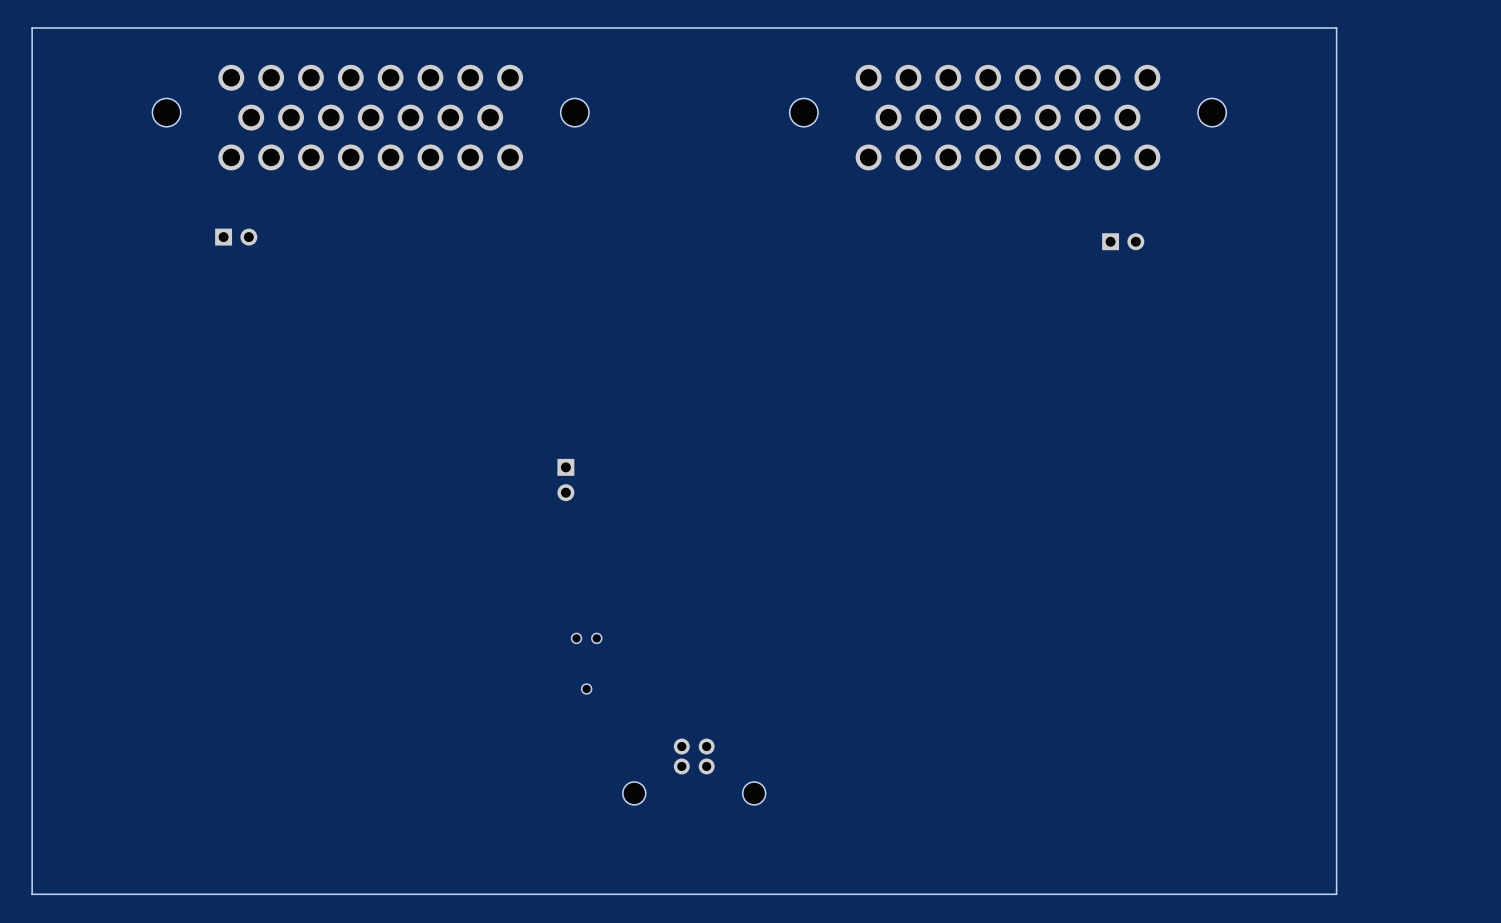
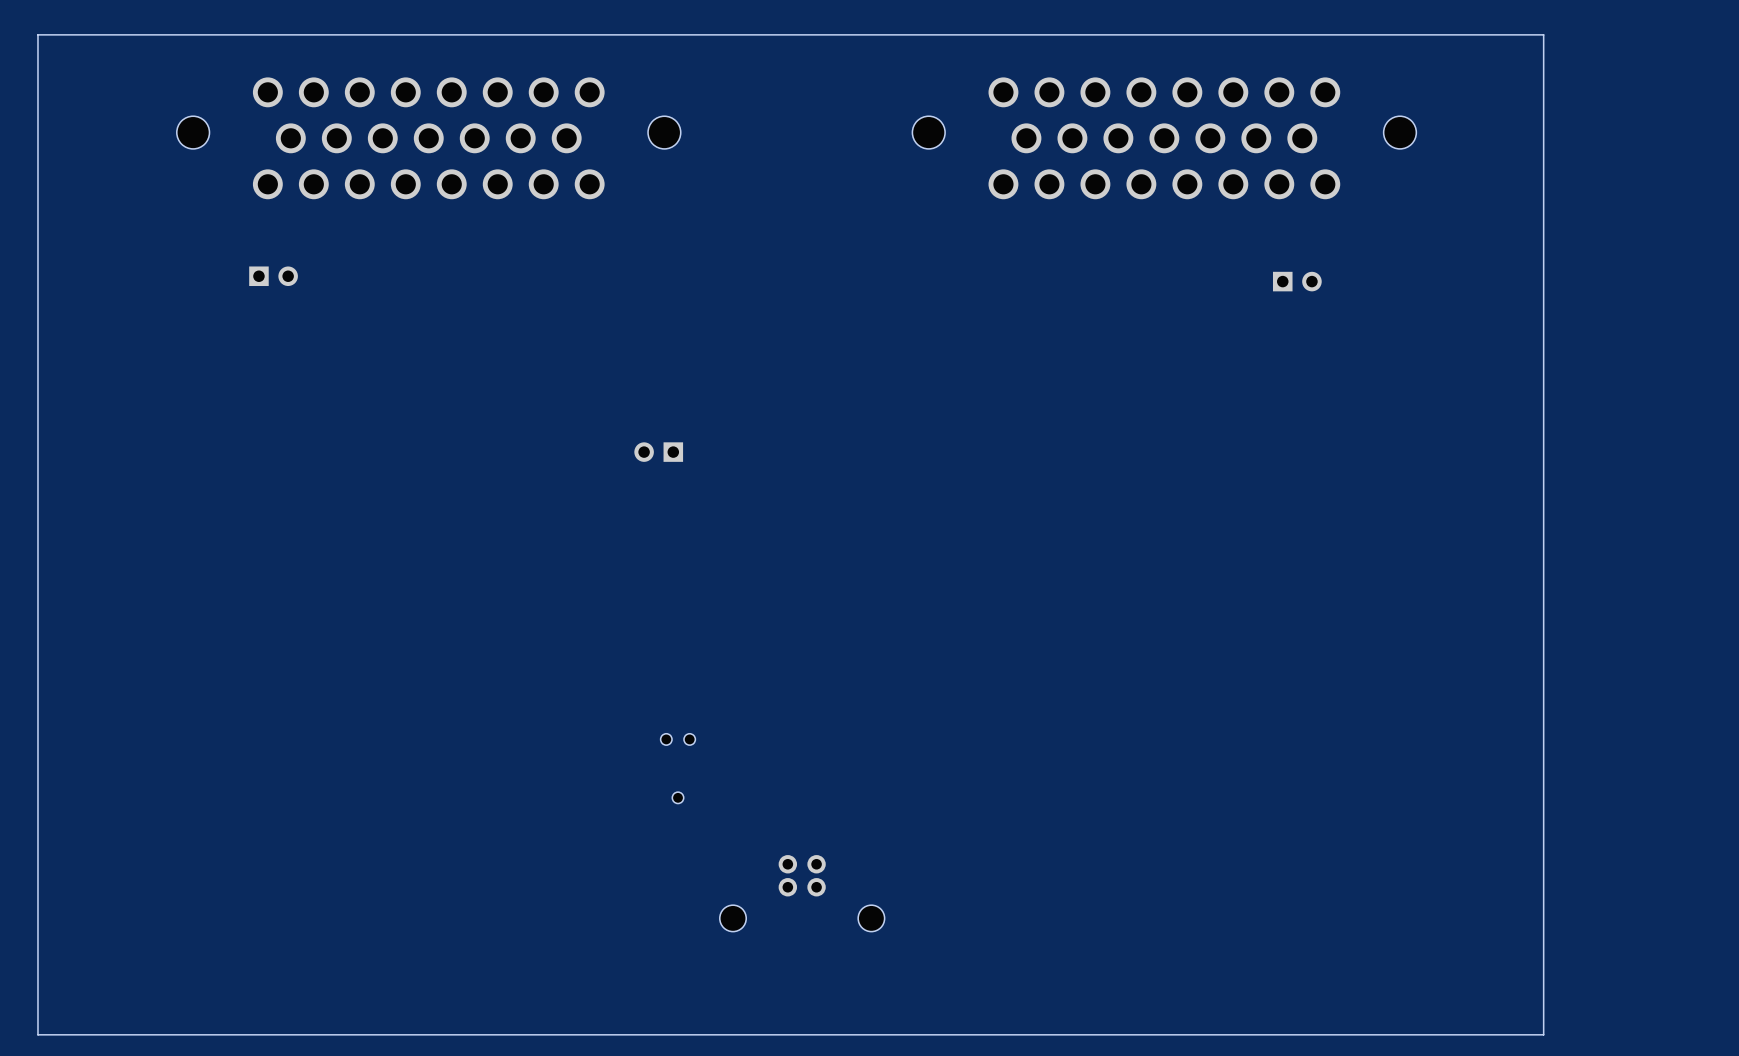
part rotation: 0° (565, 480) -> 90° clockwise (658, 452)
part position: (565, 480) -> (658, 452)

